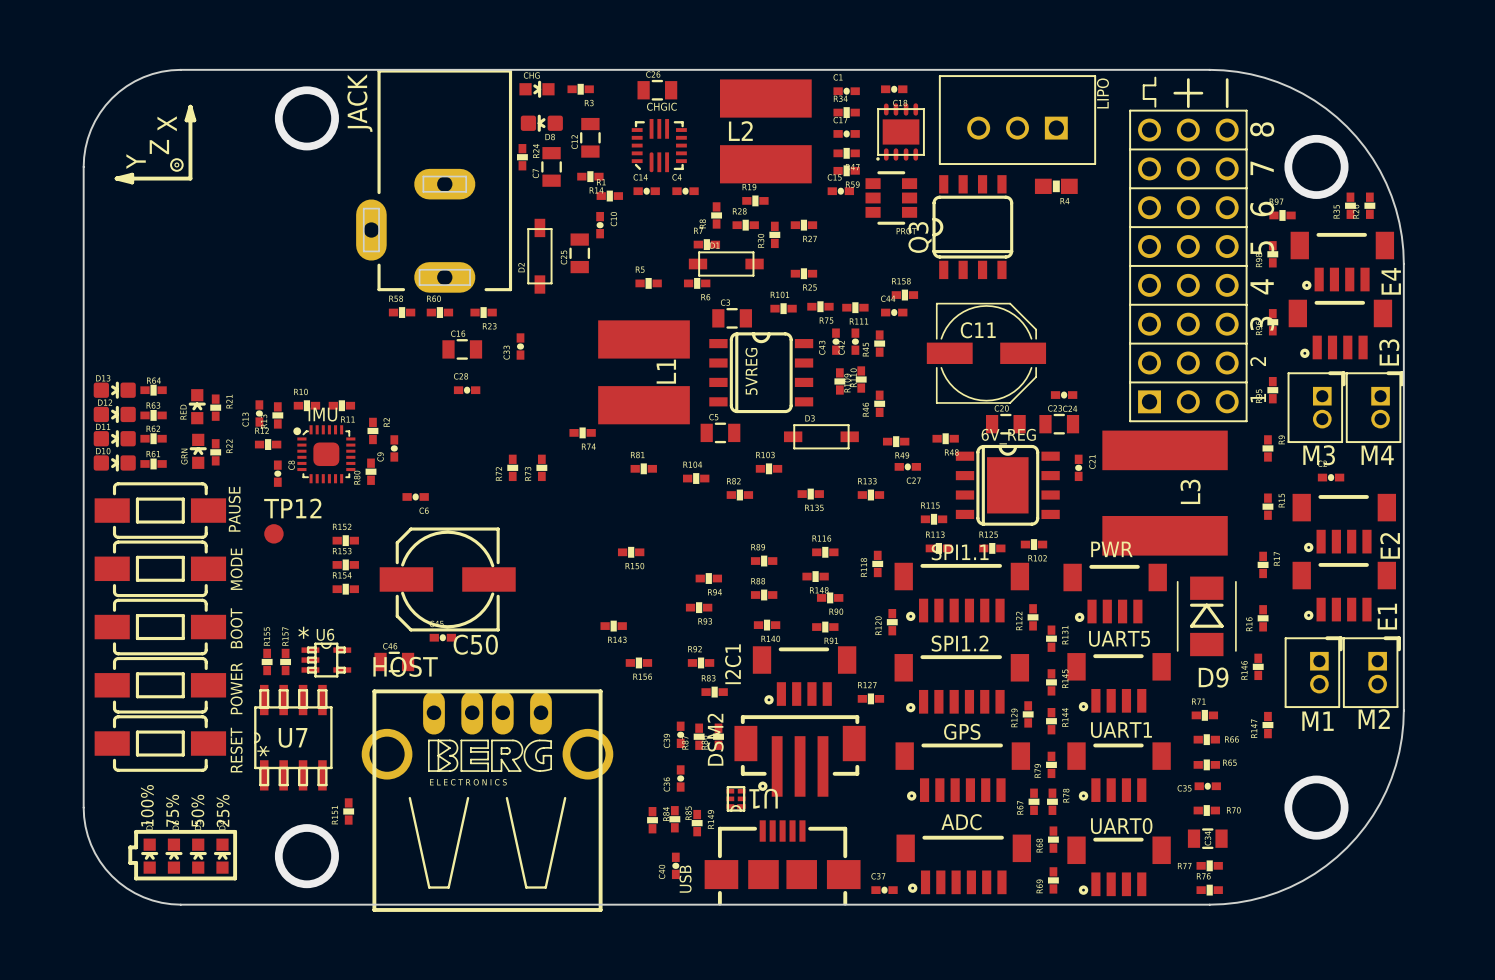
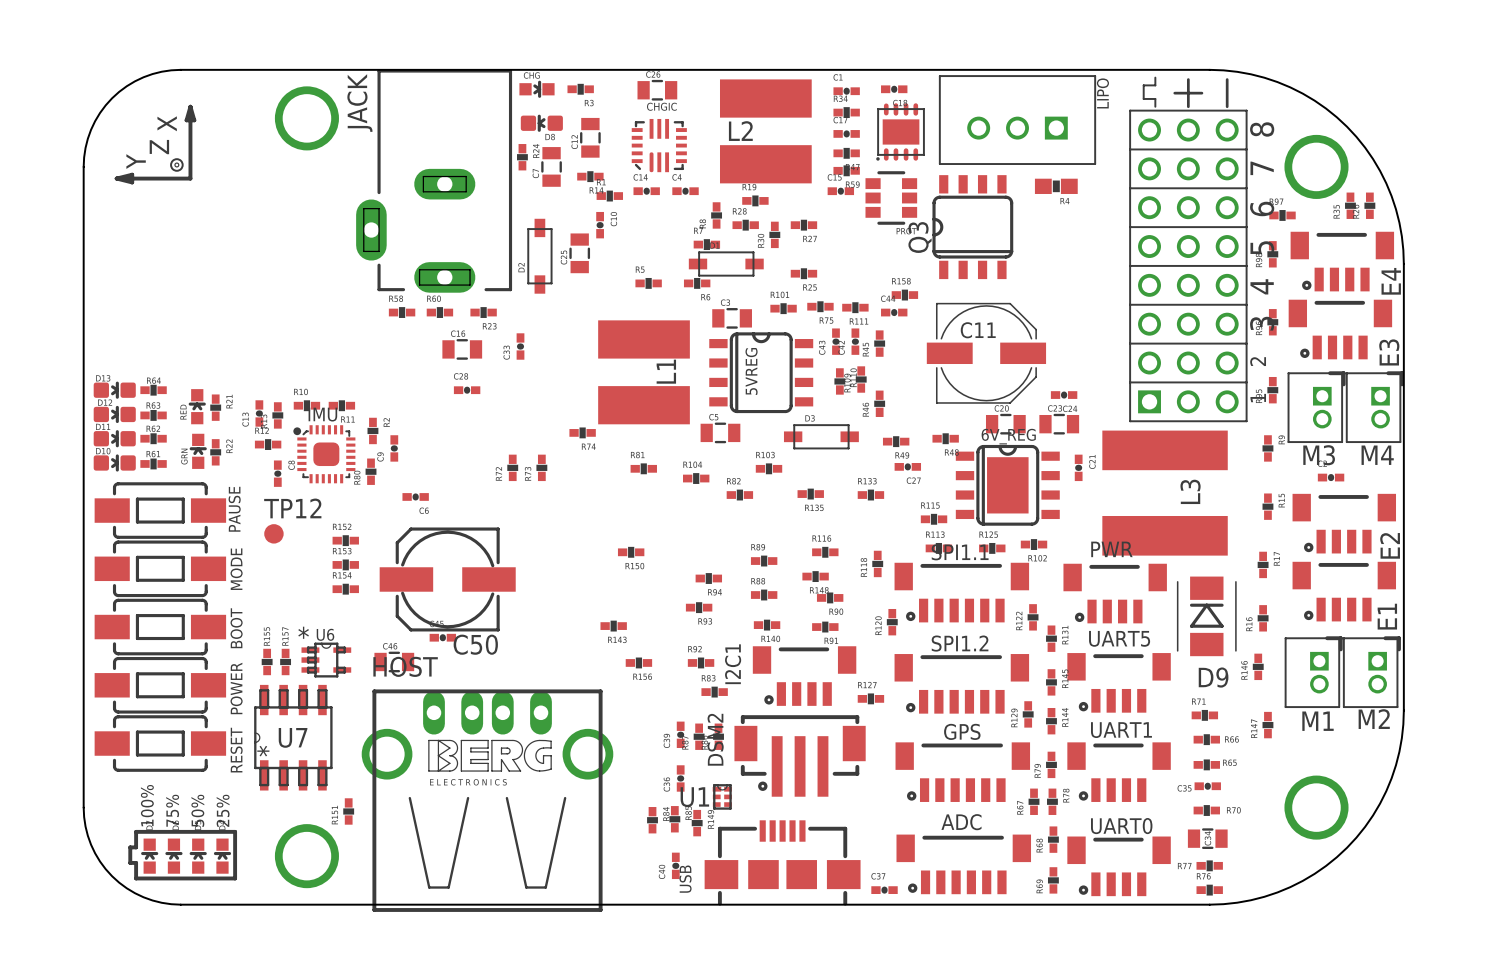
U1 rotation: 0° (736, 798) -> 180° (722, 796)

